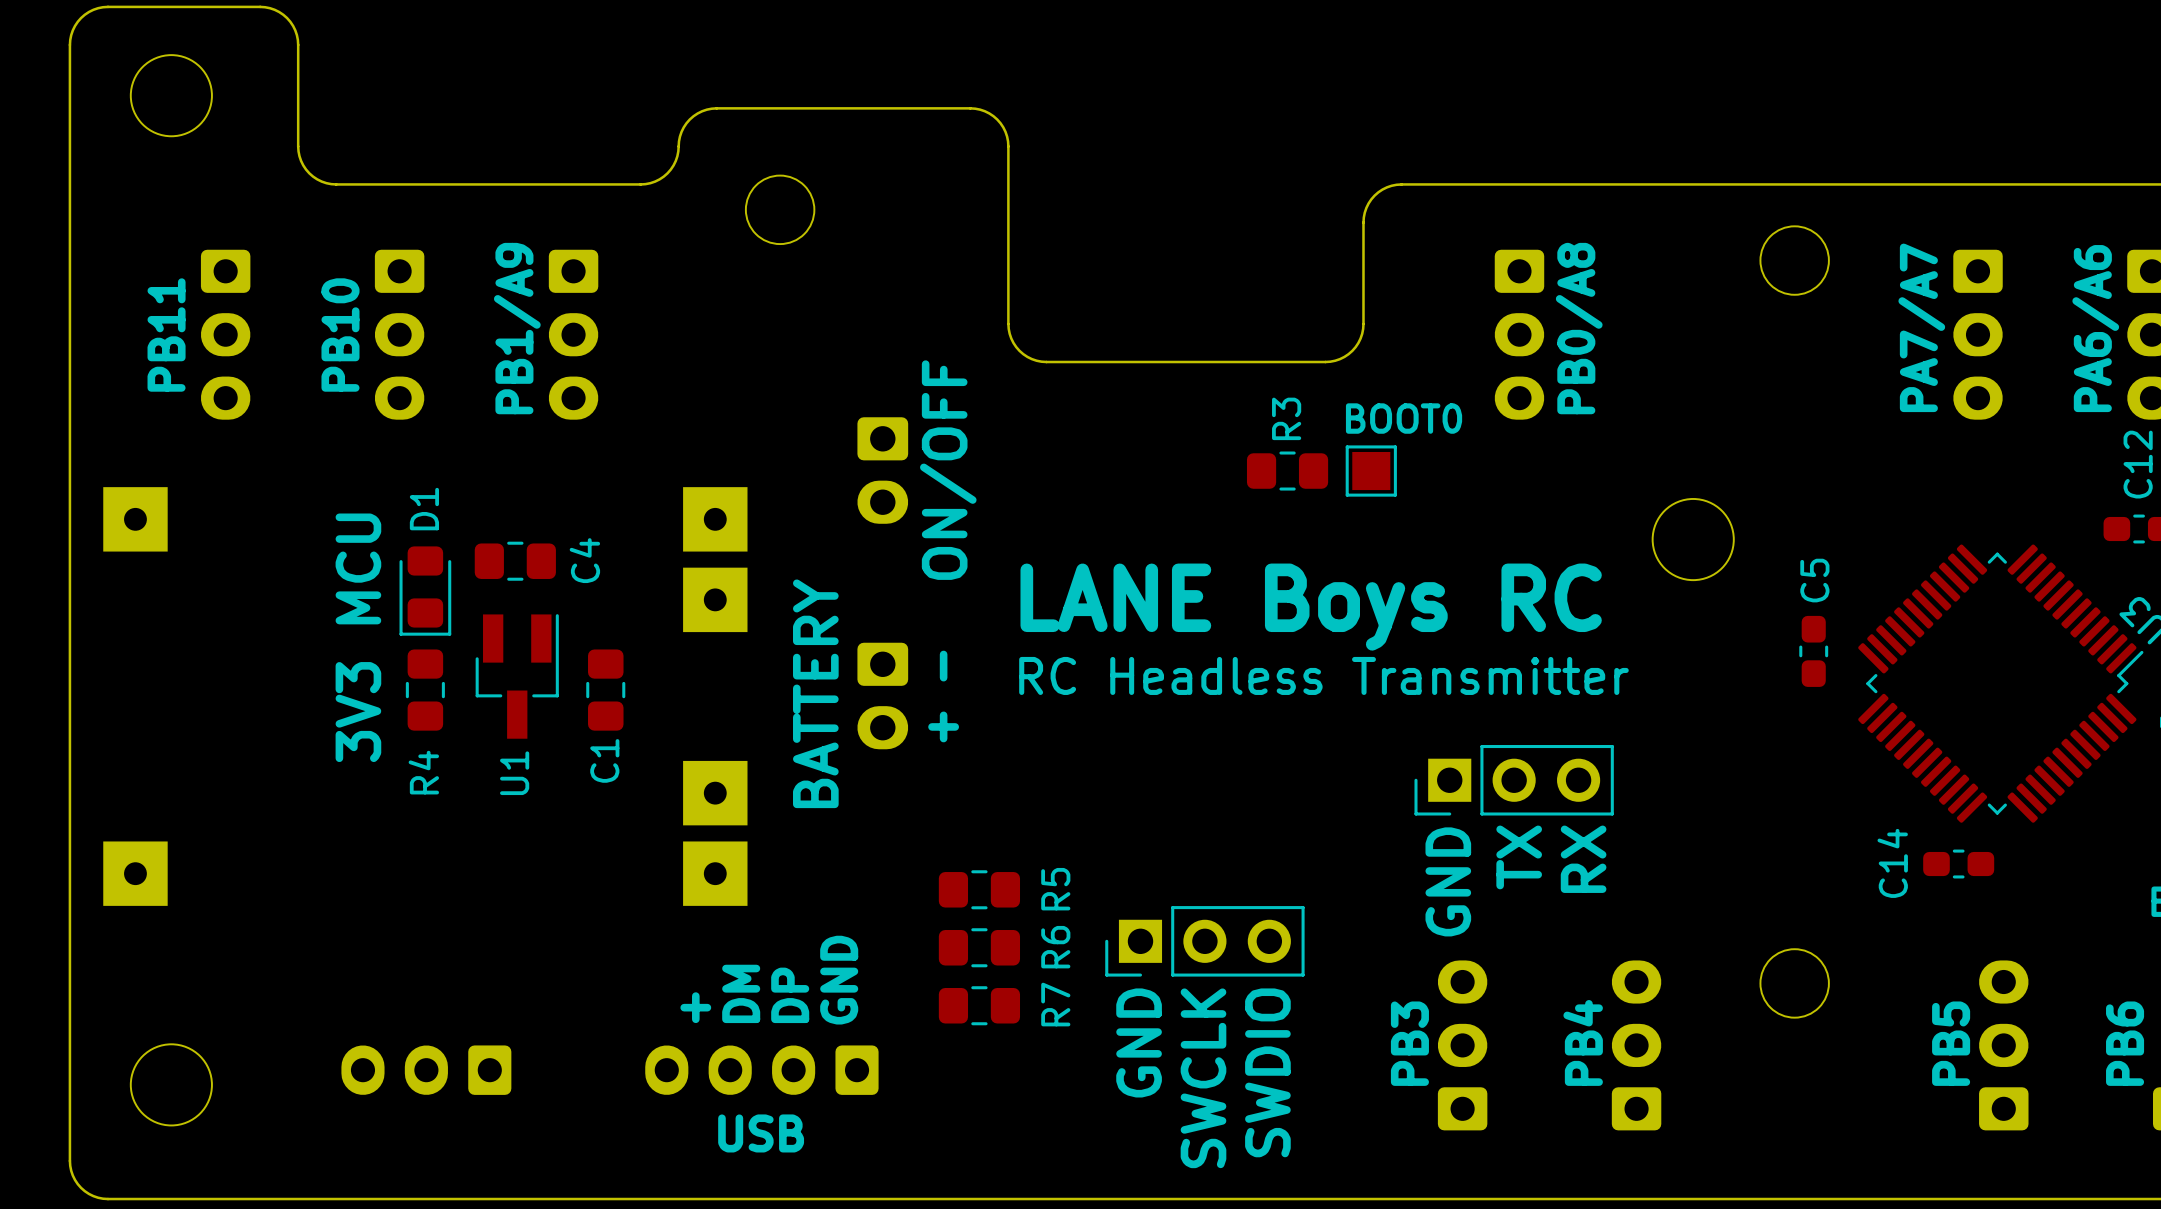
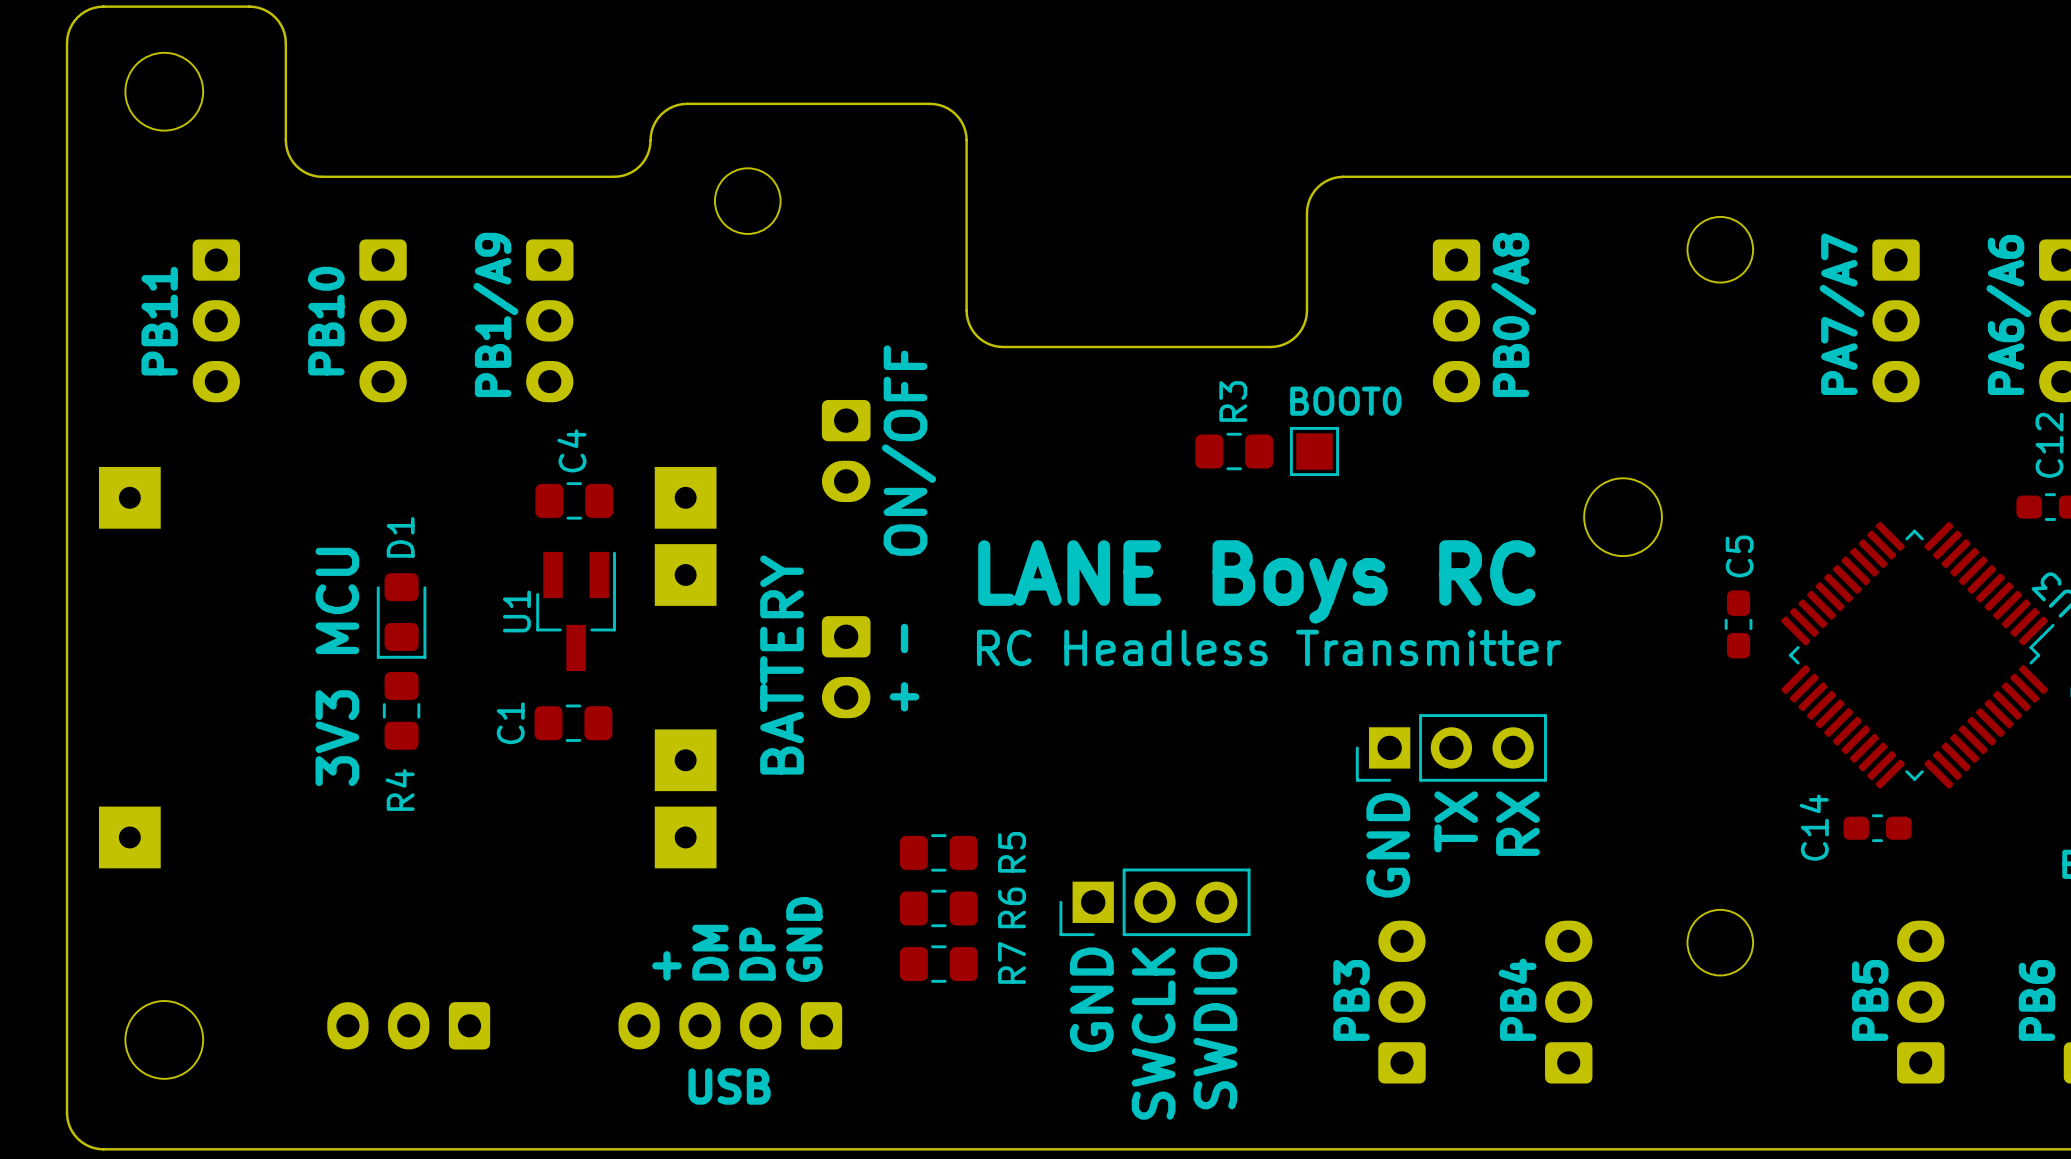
C4 name position: C4 (584, 560) -> C4 (571, 450)
C4 position: (515, 561) -> (574, 500)
D1 position: (425, 591) -> (401, 615)
text position: 3V3 MCU (358, 637) -> 3V3 MCU (337, 666)
U1 position: (517, 676) -> (576, 611)
R4 position: (425, 690) -> (401, 710)
C1 rotation: 0° (605, 690) -> 90° clockwise (573, 723)
C1 position: (605, 690) -> (573, 723)
U1 name position: U1 (514, 773) -> U1 (516, 611)

